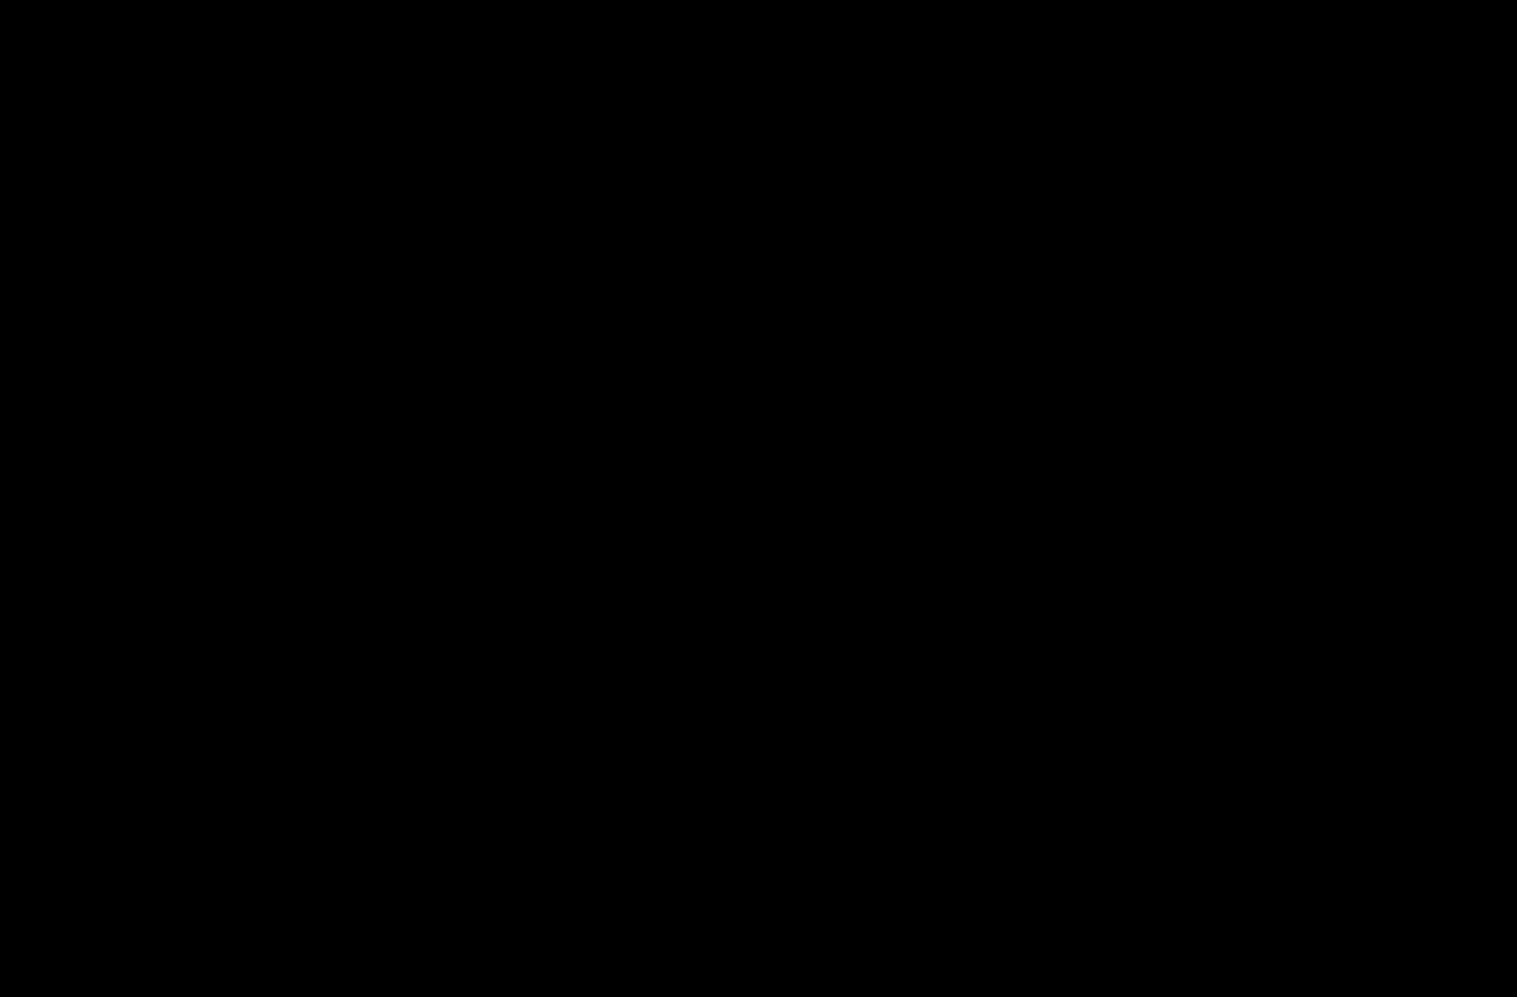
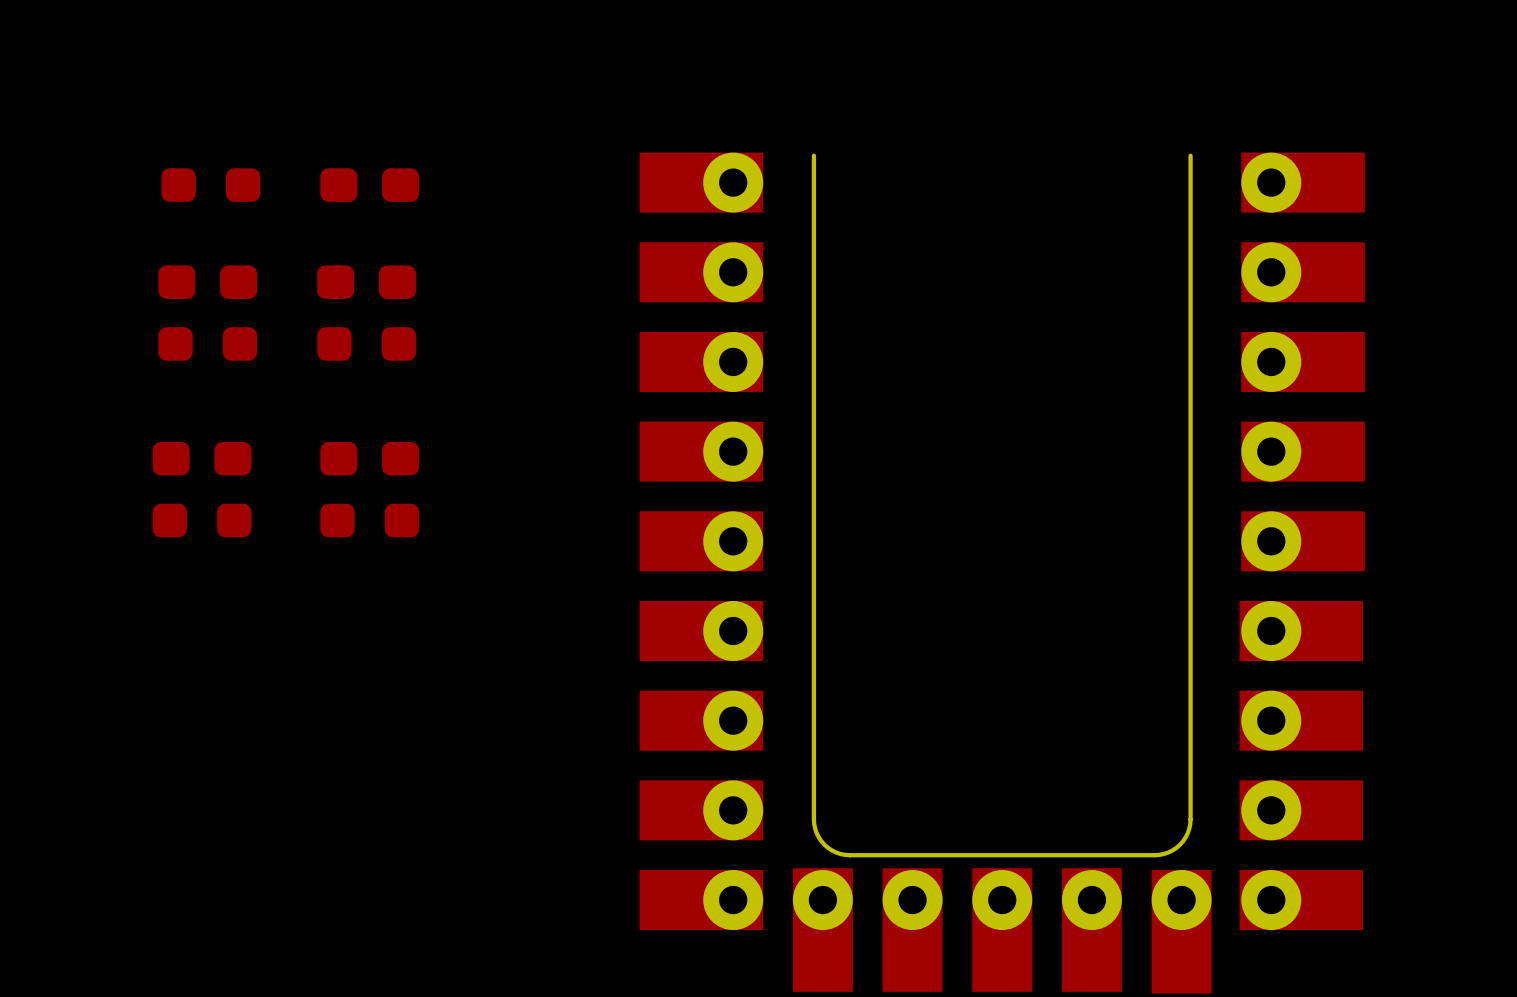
part: none -> (210, 185)
part: none -> (369, 185)
part: none -> (207, 282)
part: none -> (366, 282)
part: none -> (207, 343)
part: none -> (366, 343)
part: none -> (202, 458)
part: none -> (369, 458)
part: none -> (202, 520)
part: none -> (369, 520)
part: none -> (1002, 573)

